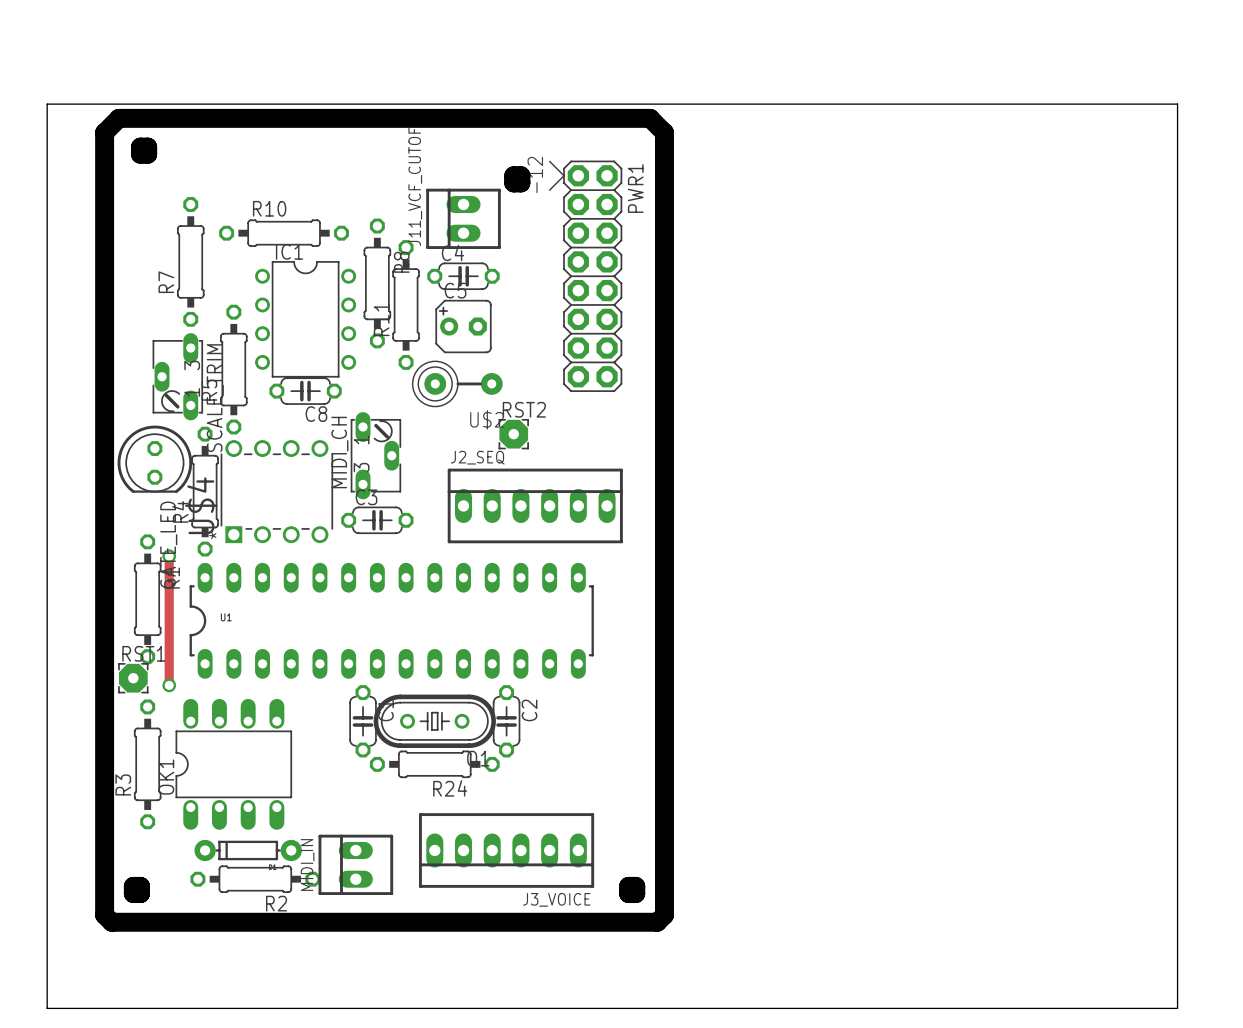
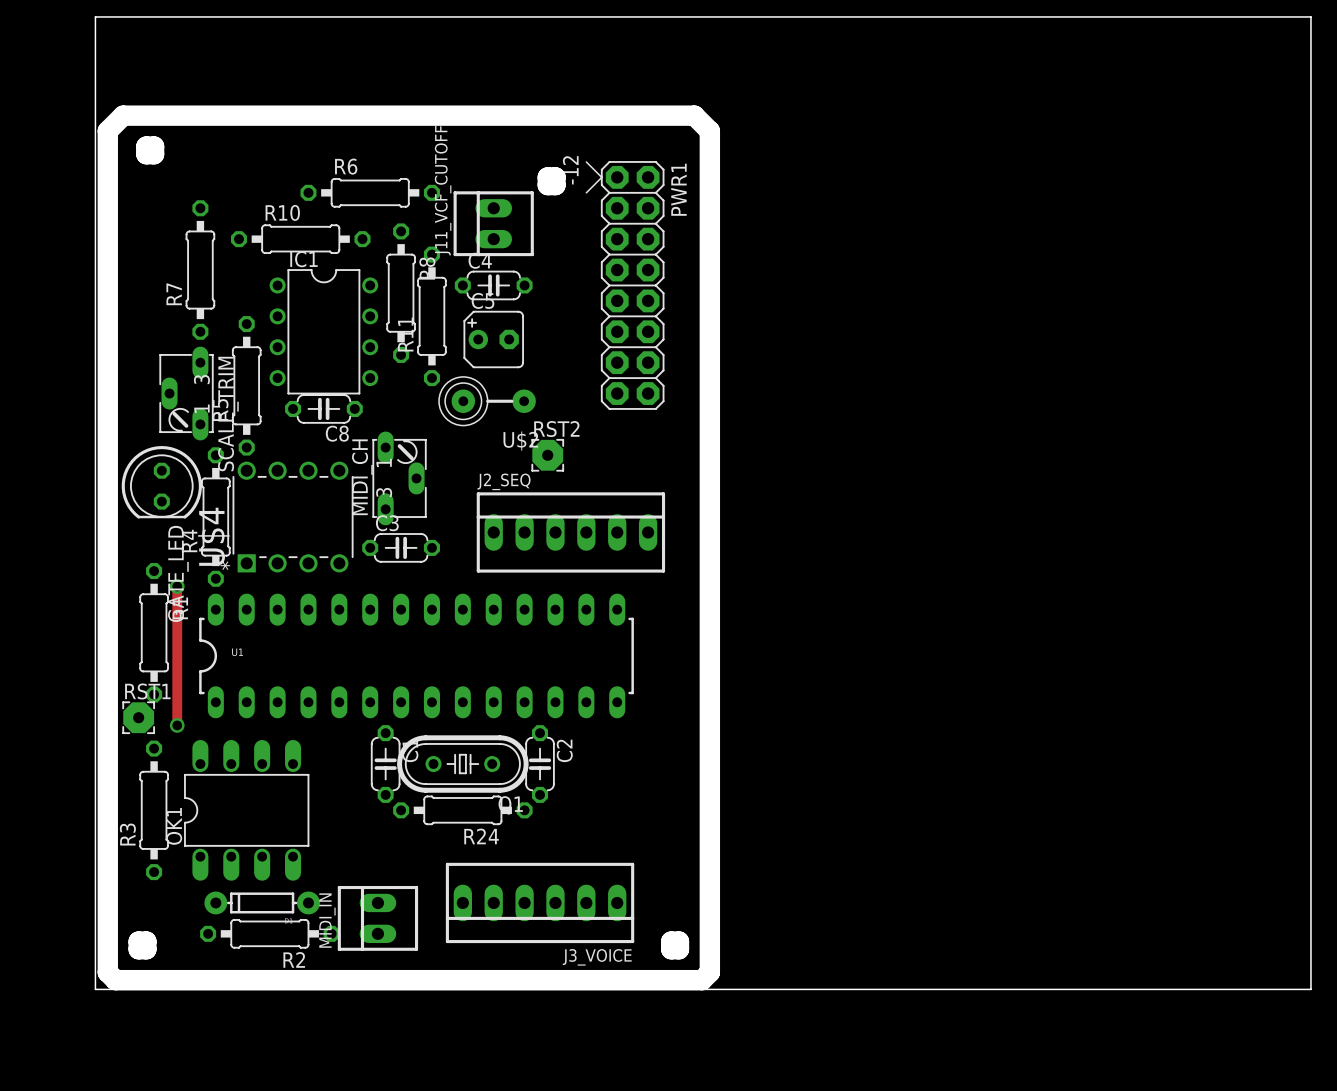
board edge: (47, 104) (1177, 104) (1177, 1008) (47, 1008) (47, 104) -> (95, 16) (1310, 16) (1310, 989) (95, 989) (95, 16)
R6: none -> (370, 192)

